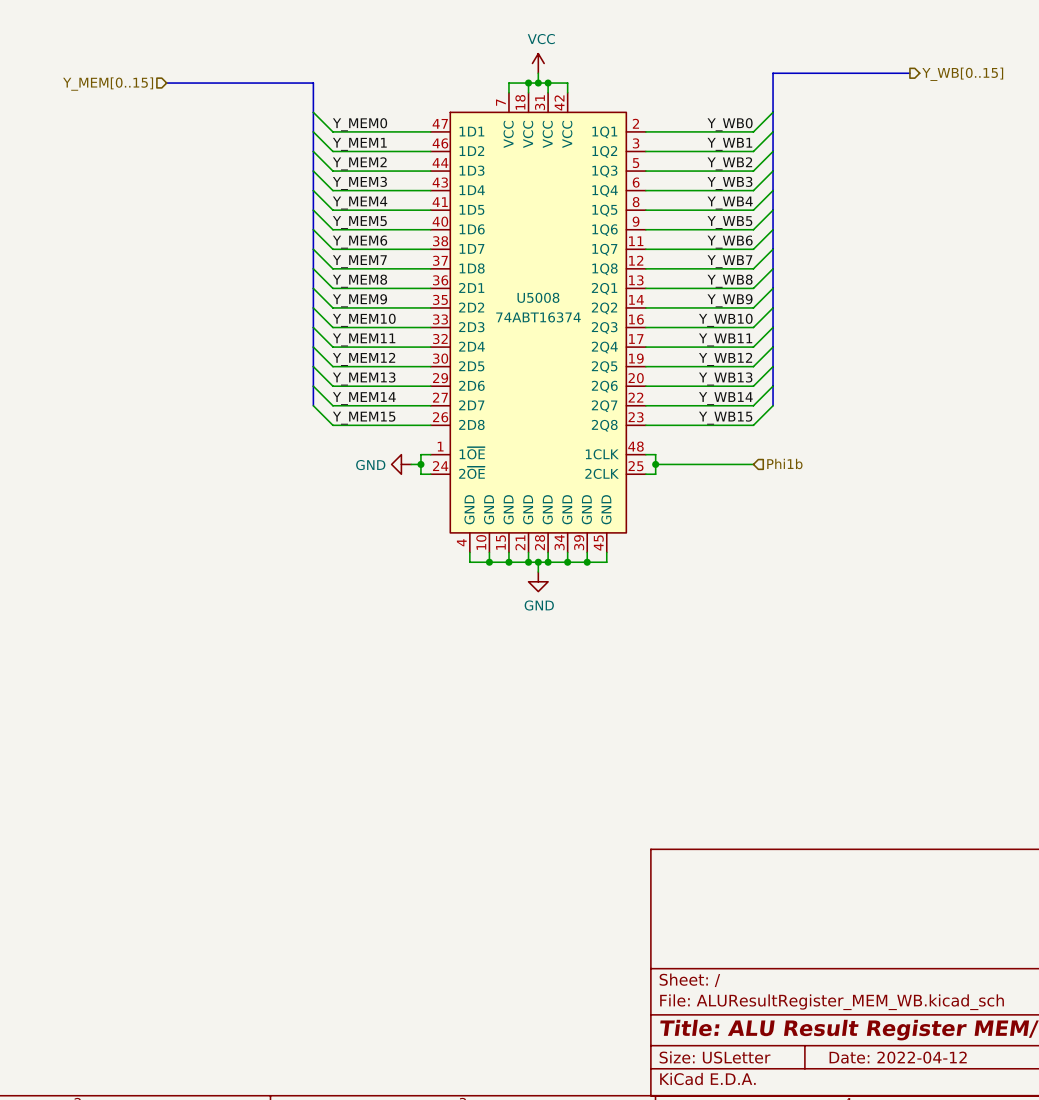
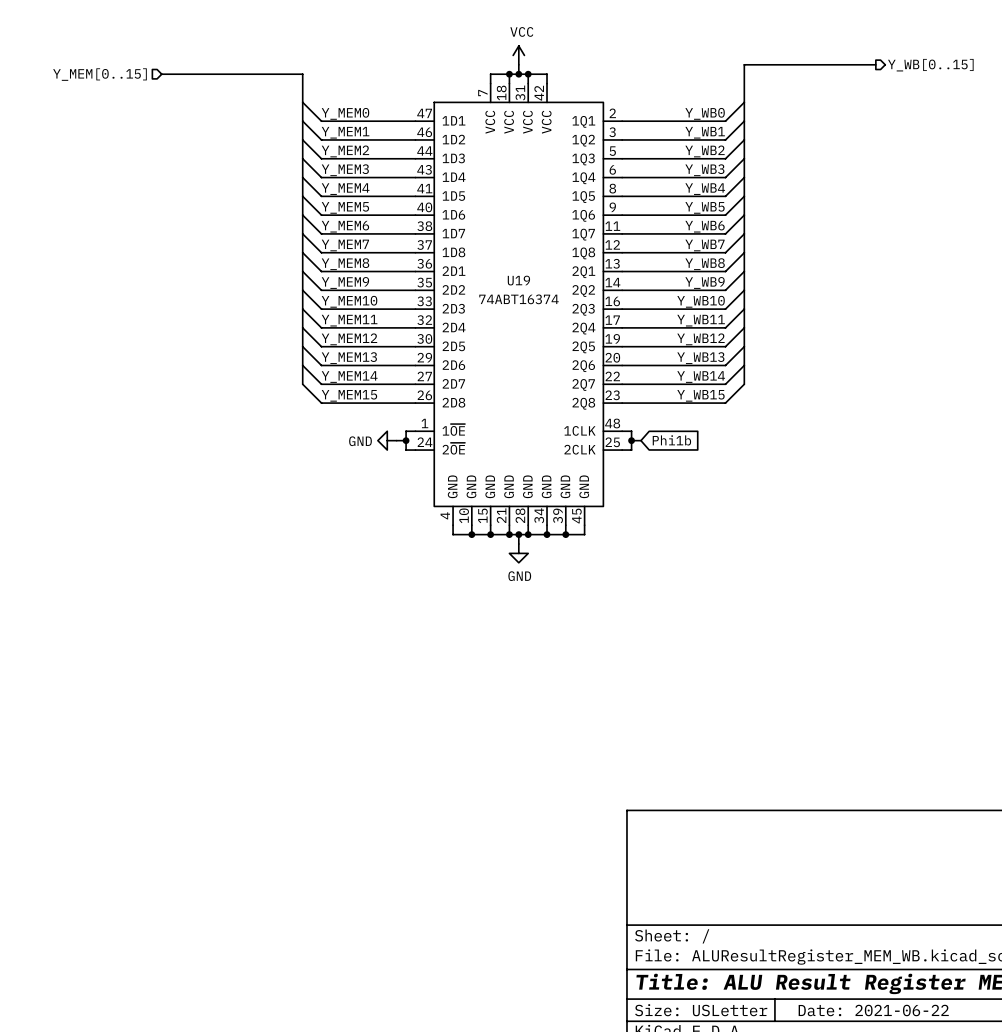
U5008 name: U5008 (538, 297) -> U19 (518, 280)
hierarchical label: Phi1b (784, 463) -> none
wire: (665, 464) (753, 464) -> none
global label: none -> Phi1b (671, 440)
title block: Date: 2022-04-12 (898, 1057) -> Date: 2021-06-22 (873, 1010)

